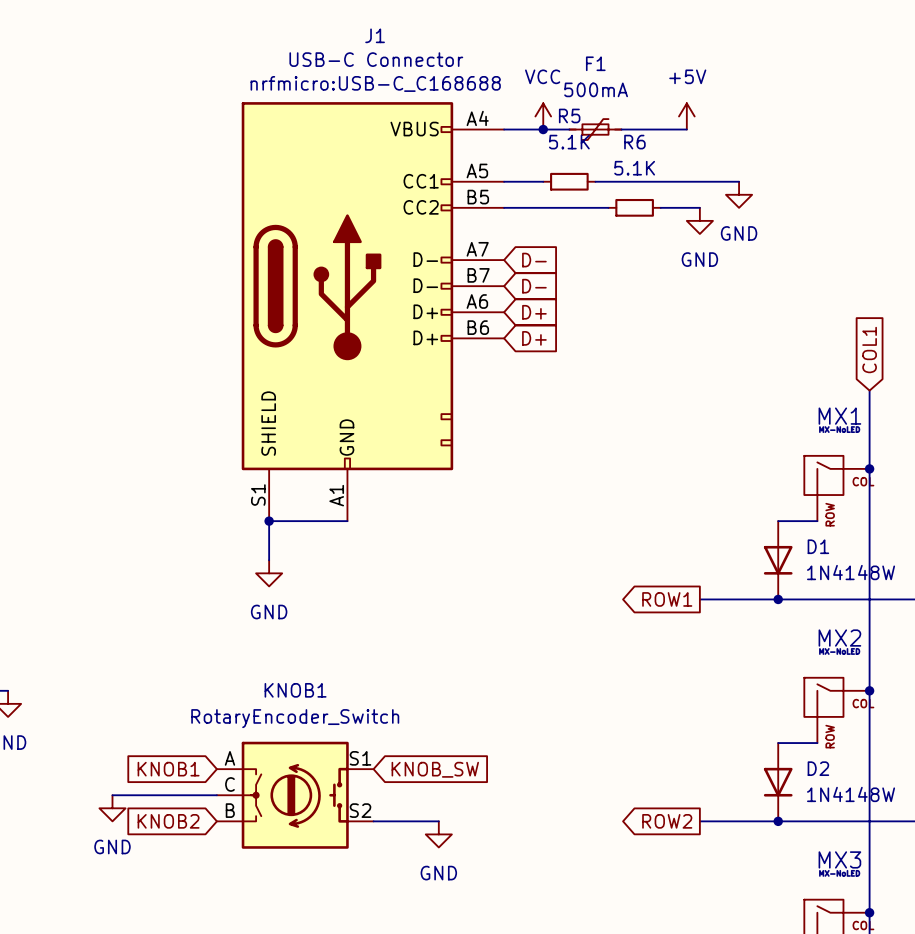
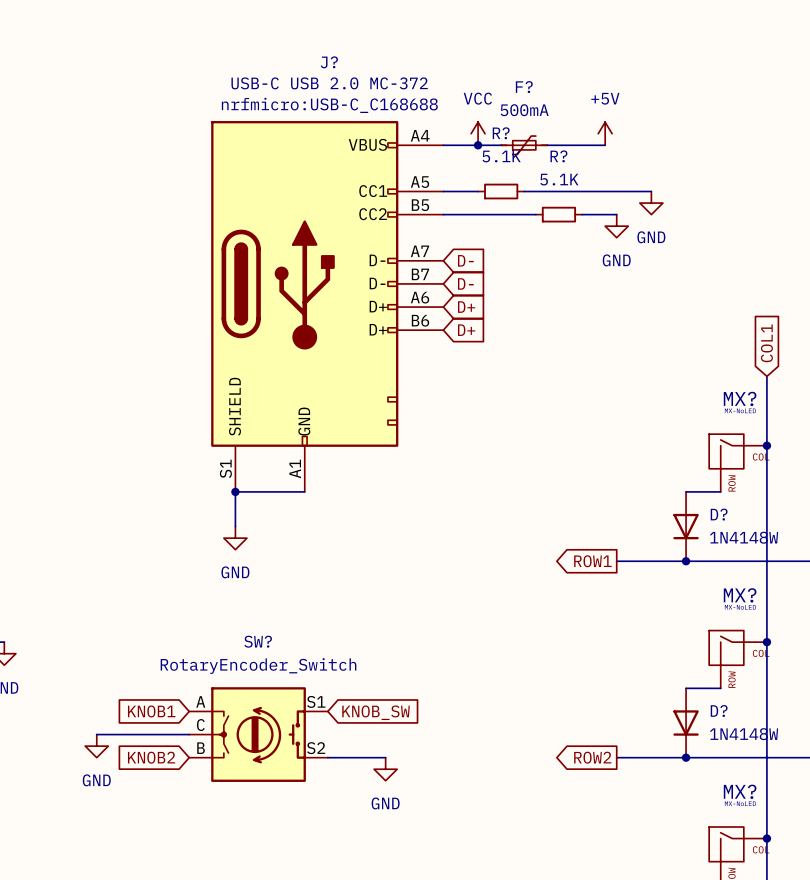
J1 name: J1 (375, 35) -> J? (329, 62)
J1 value: USB-C Connector (376, 59) -> USB-C USB 2.0 MC-372 (329, 83)
F1 name: F1 (595, 63) -> F? (524, 87)
R5 name: R5 (569, 115) -> R? (501, 133)
R6 name: R6 (634, 142) -> R? (558, 156)
MX1 name: MX1 (839, 416) -> MX? (740, 398)
D1 name: D1 (818, 546) -> D? (719, 514)
MX2 name: MX2 (839, 638) -> MX? (740, 595)
KNOB1 name: KNOB1 (295, 690) -> SW? (258, 641)
D2 name: D2 (818, 768) -> D? (719, 711)
MX3 name: MX3 (839, 859) -> MX? (740, 791)

